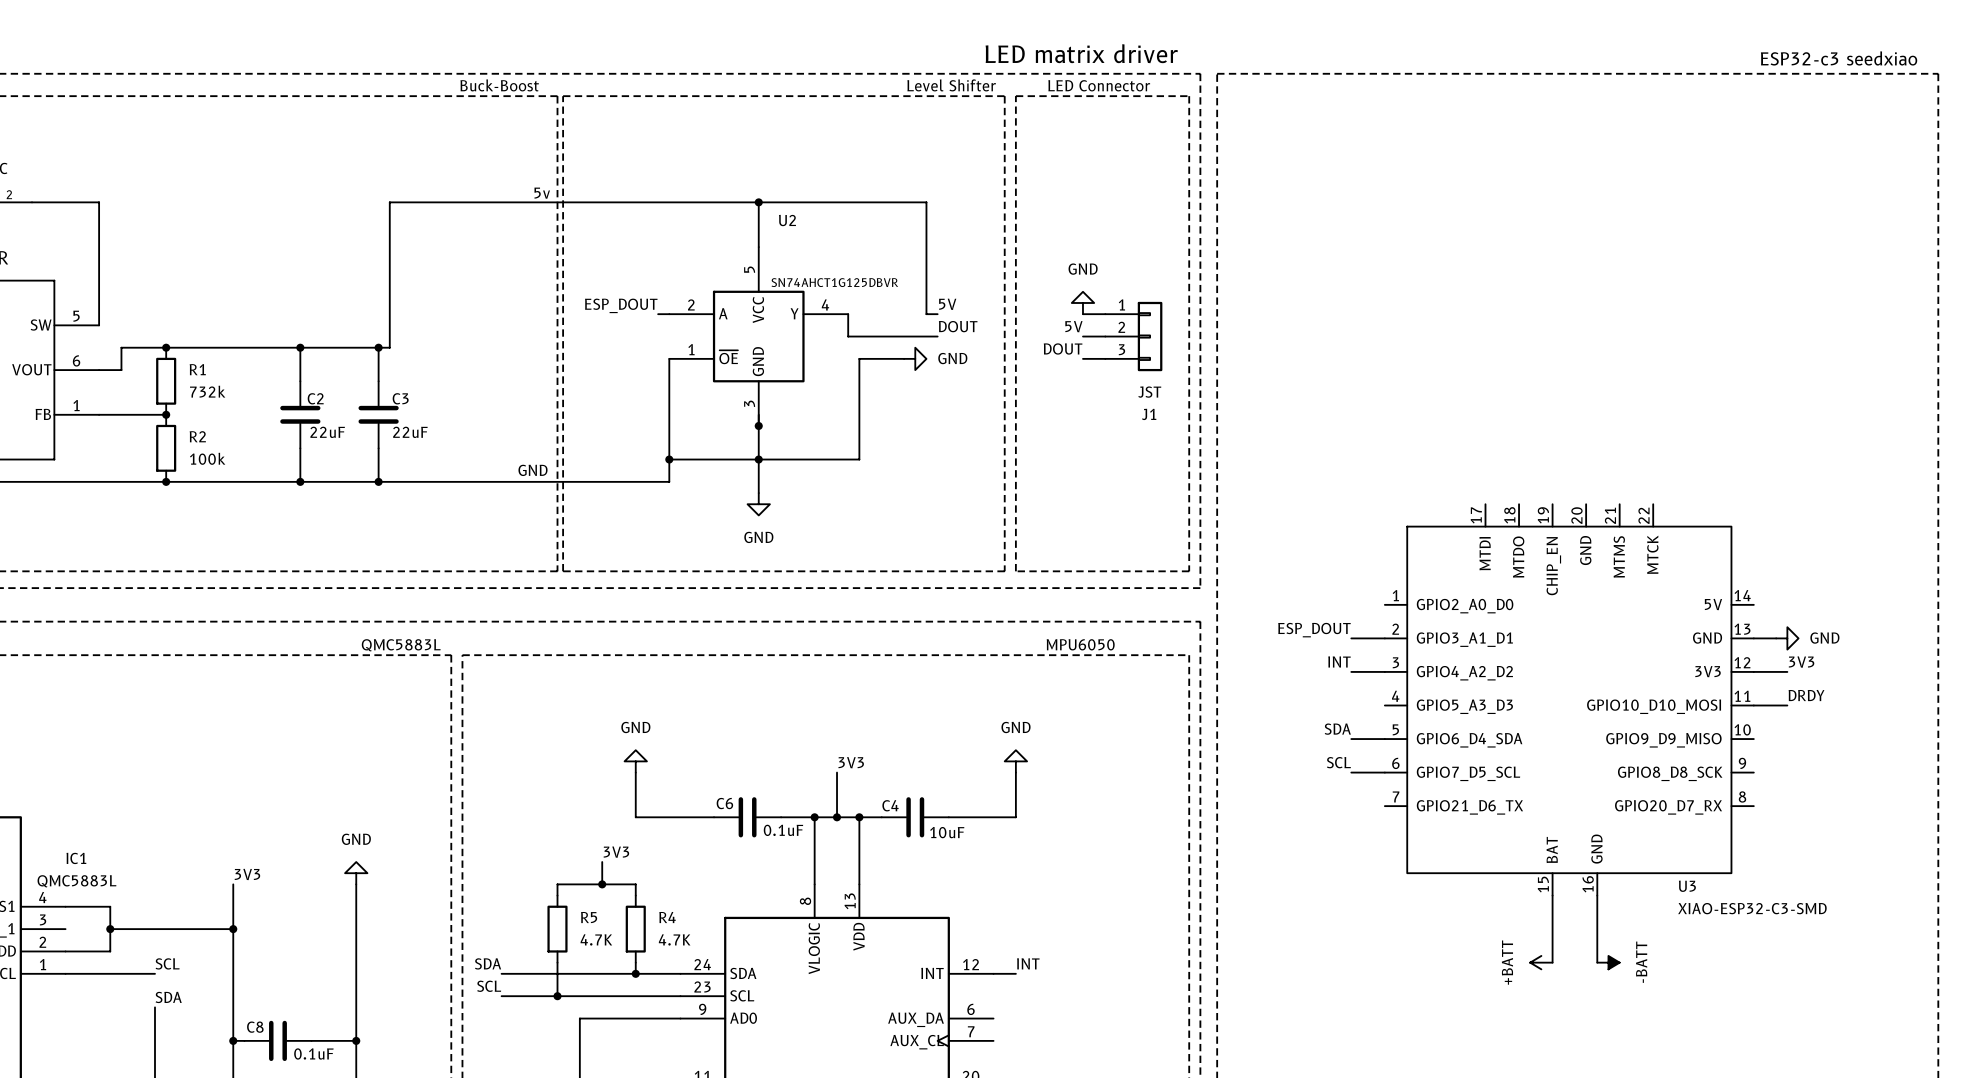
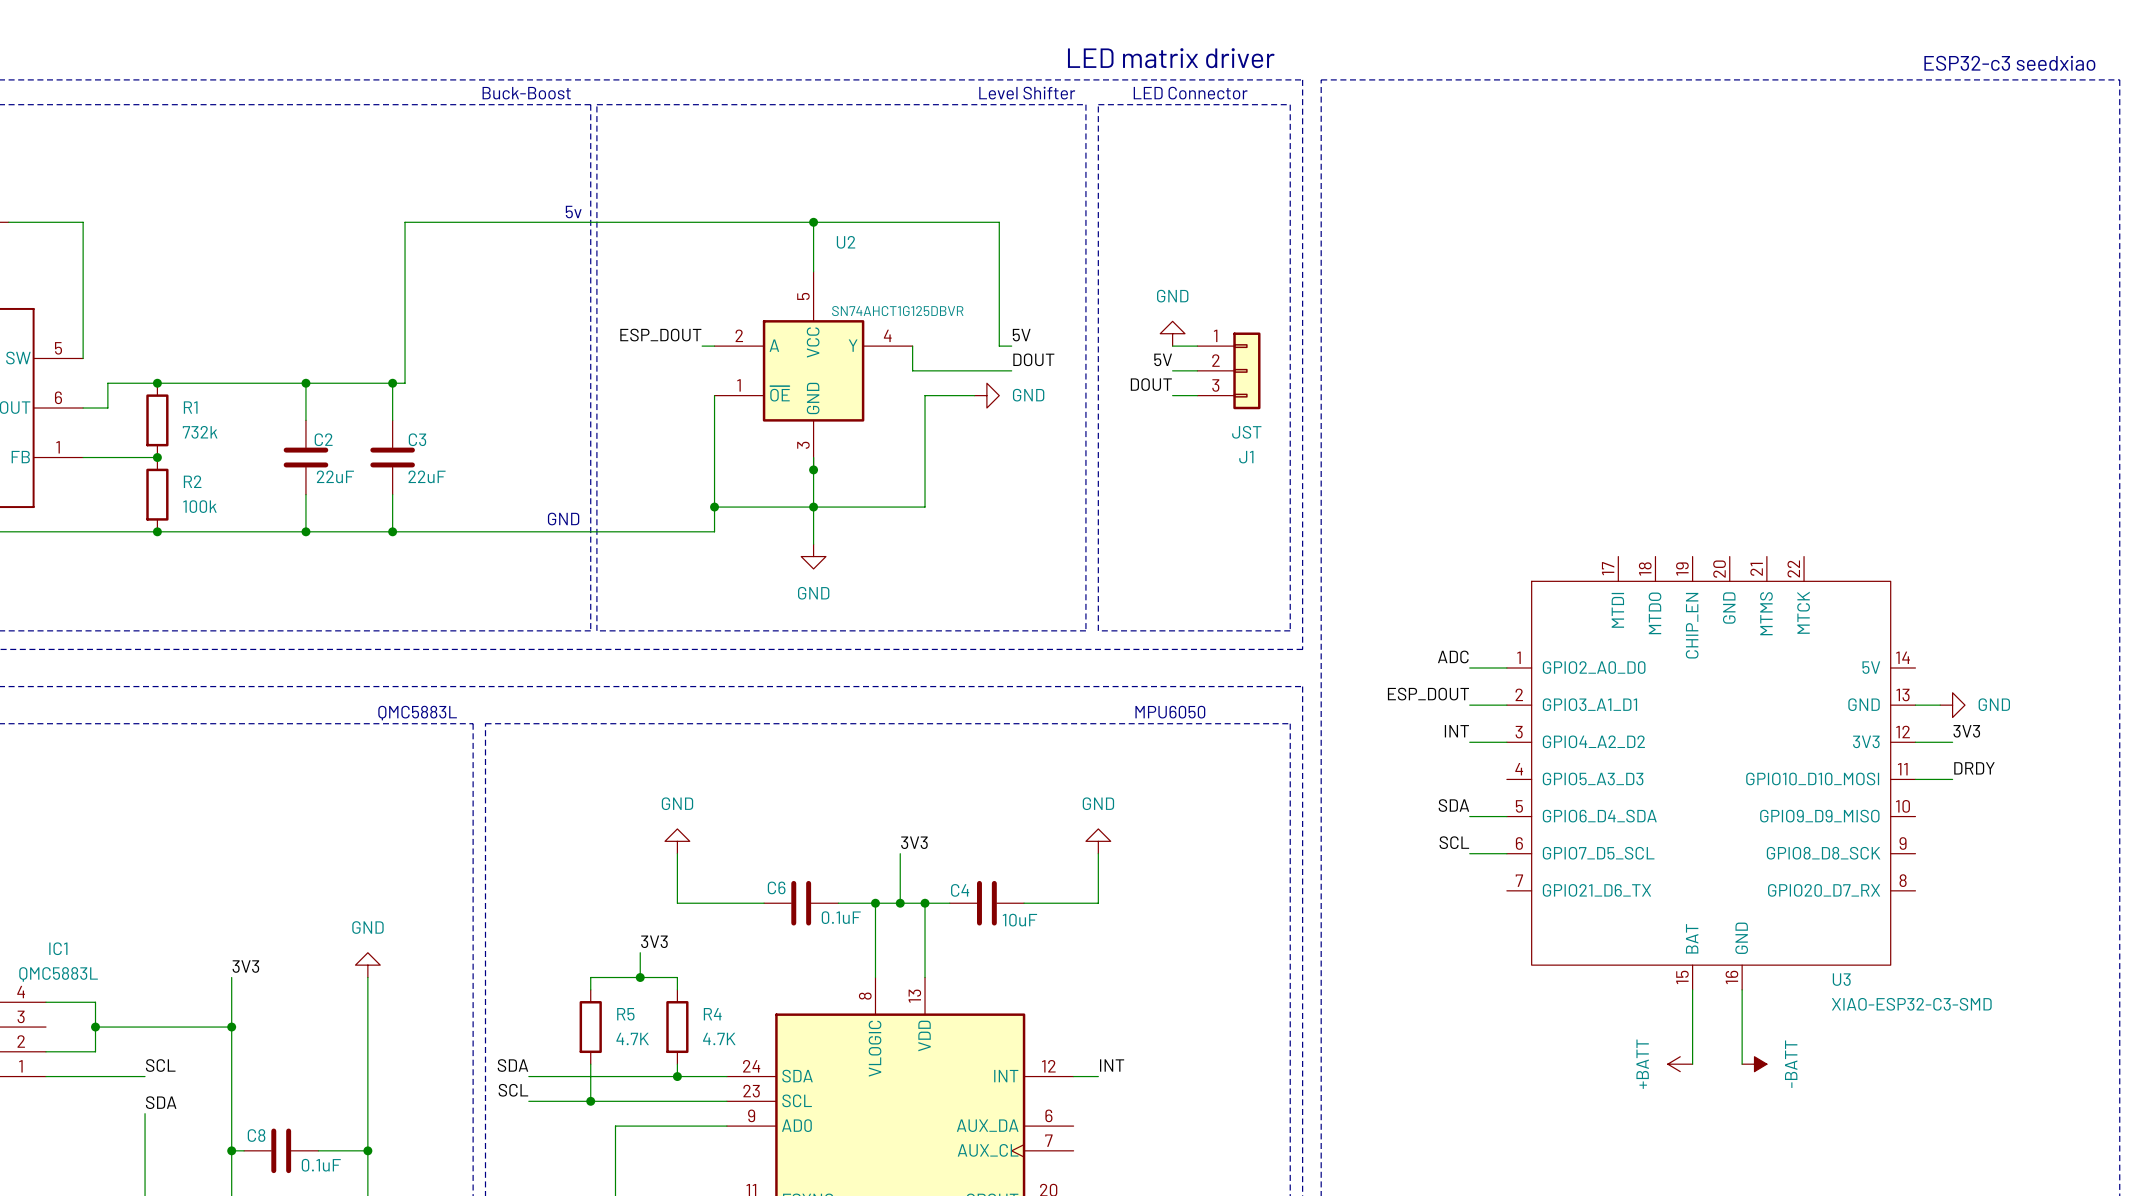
label: none -> ADC (1453, 656)
wire: none -> (1469, 667) (1506, 667)

